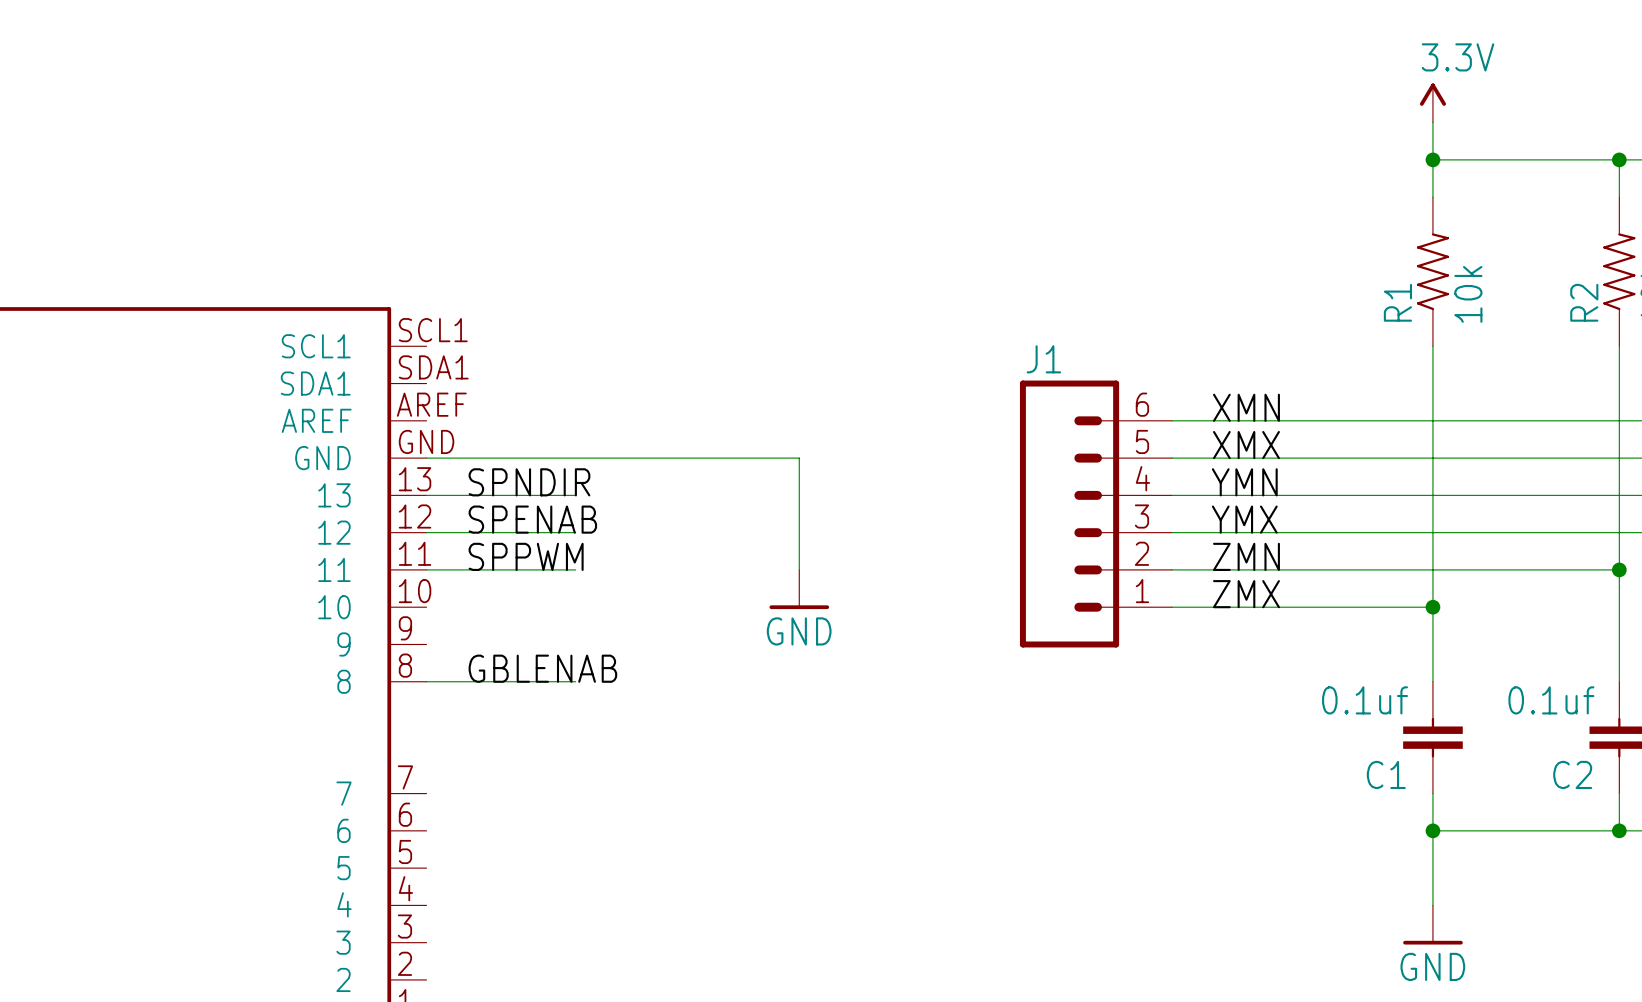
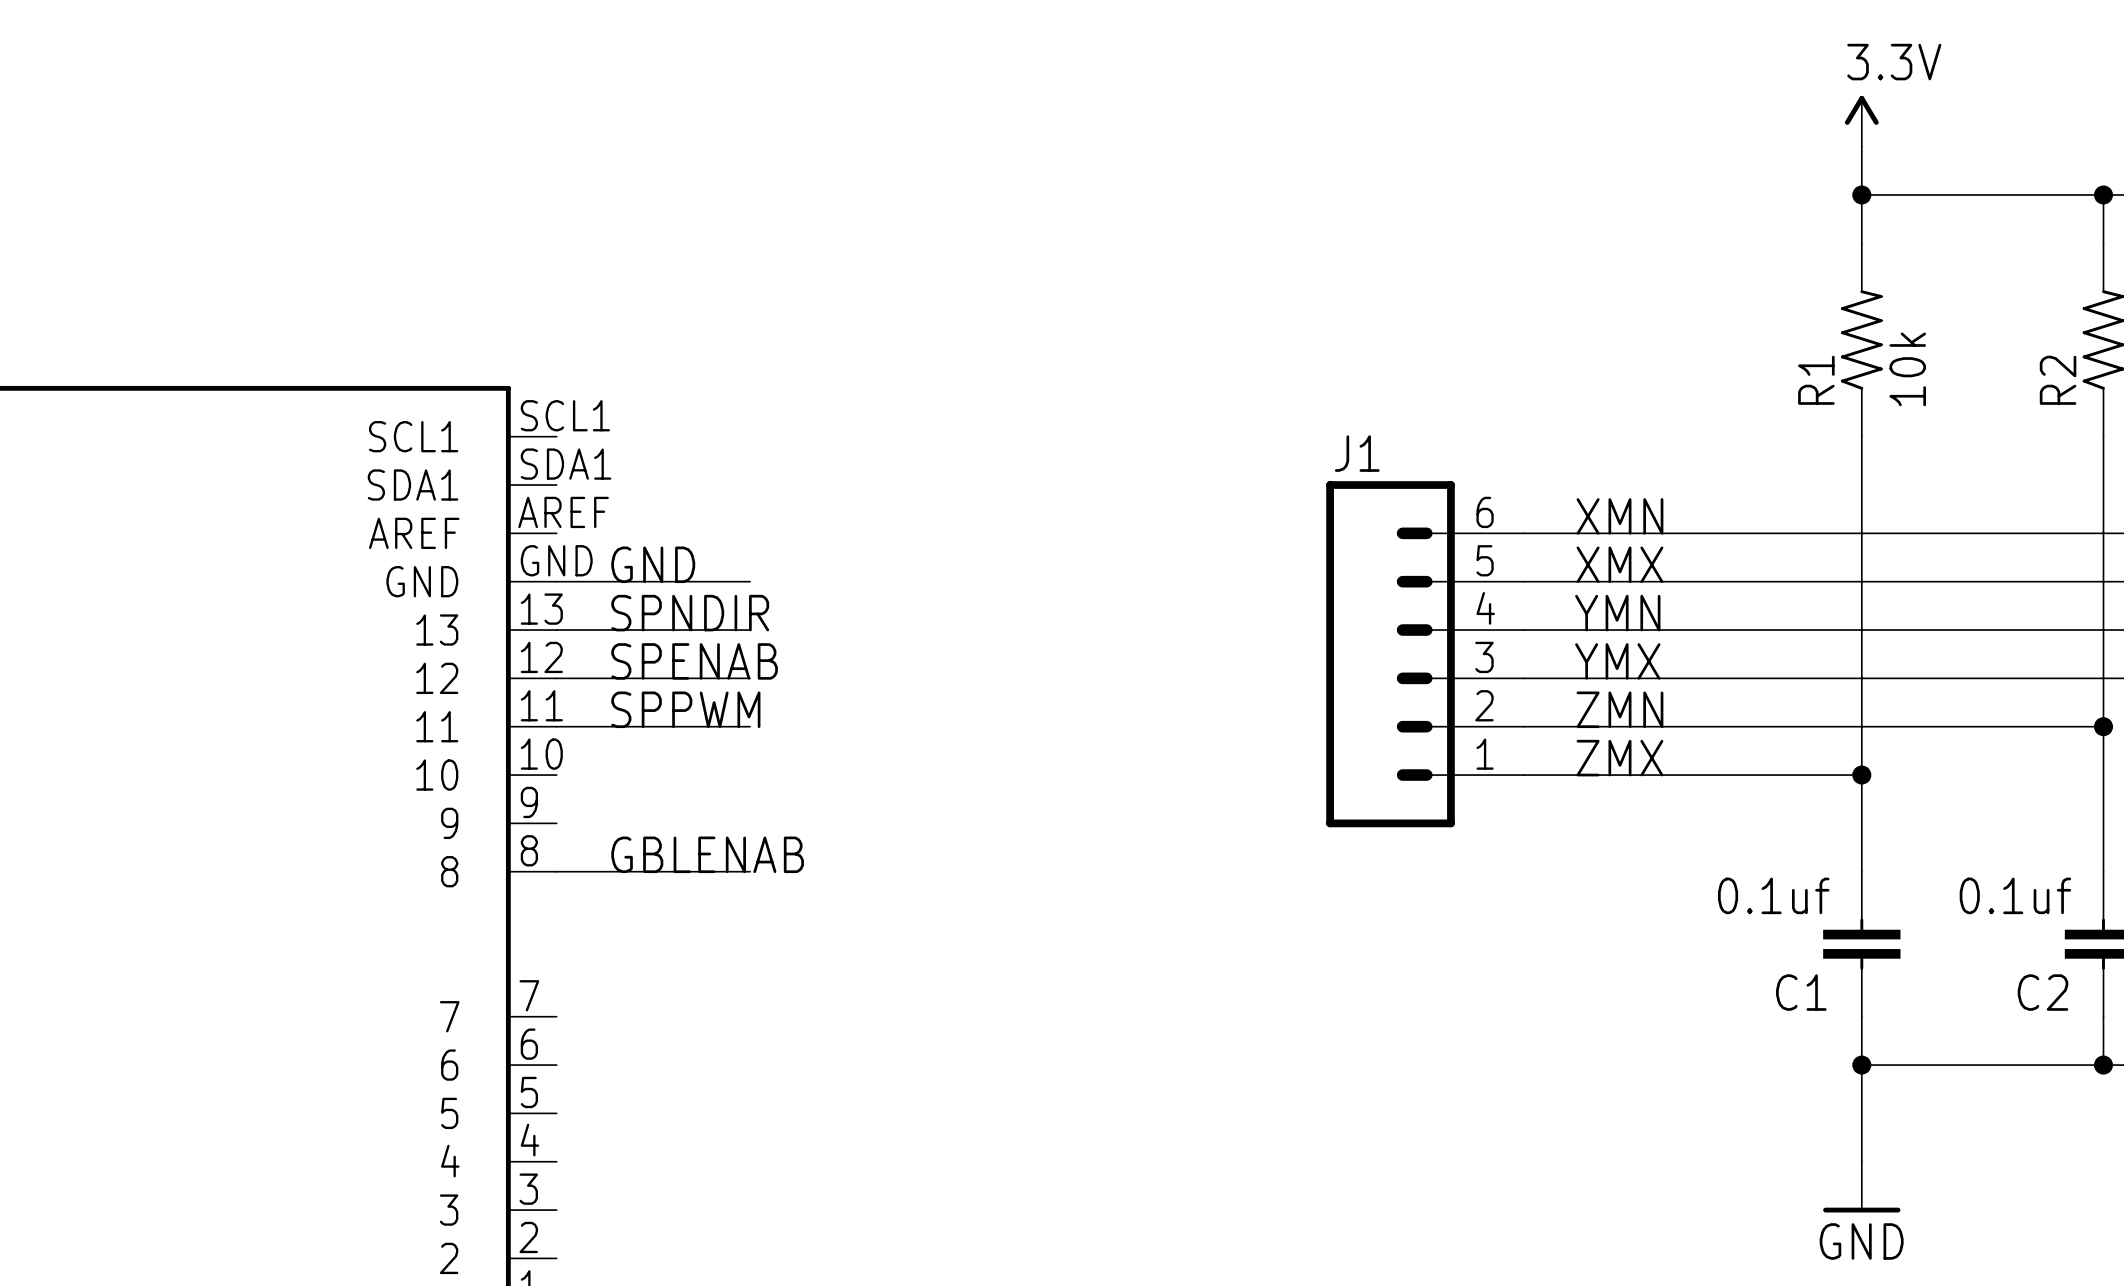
label: none -> GND (653, 564)
wire: (575, 458) (799, 458) (799, 569) -> none
power symbol: GND (799, 589) -> none

